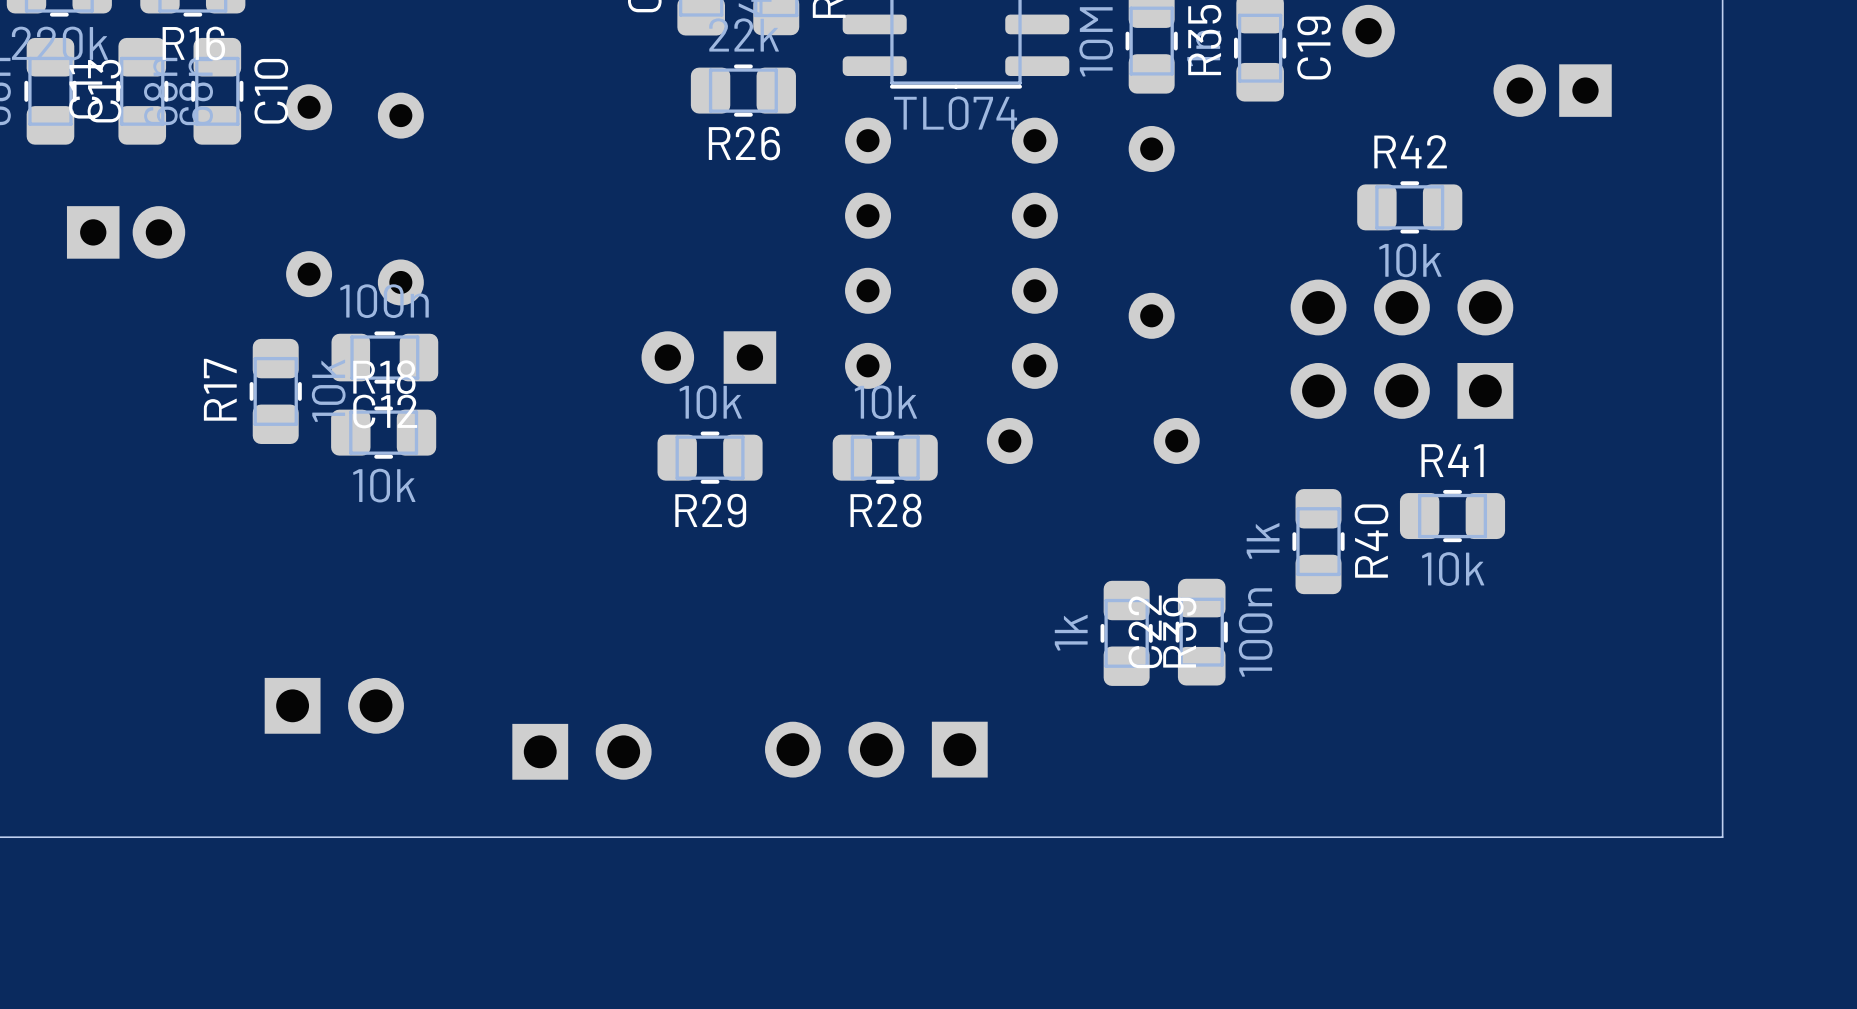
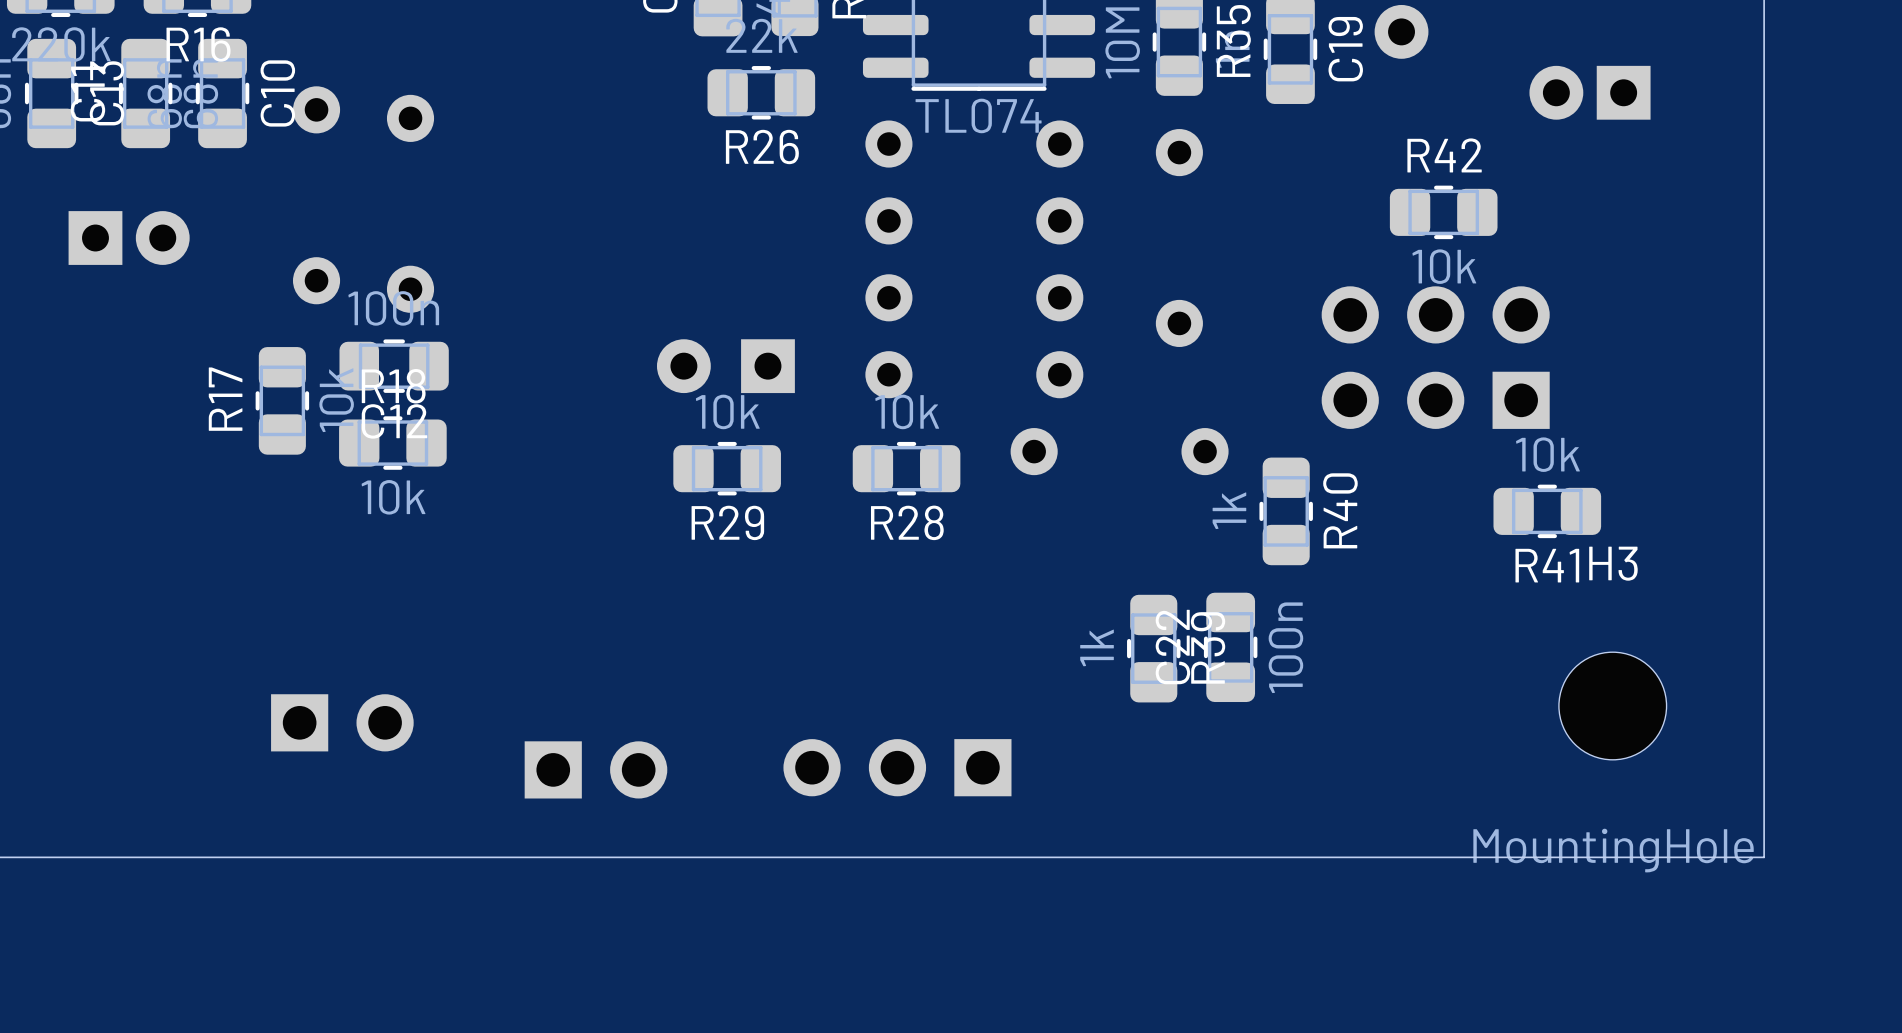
R41 name position: R41 (1452, 460) -> R41 (1547, 565)
R41 position: (1452, 516) -> (1547, 511)
R40 position: (1318, 541) -> (1286, 511)
R41 value position: 10k (1453, 569) -> 10k (1547, 454)
H3: none -> MountingHole (1612, 706)

